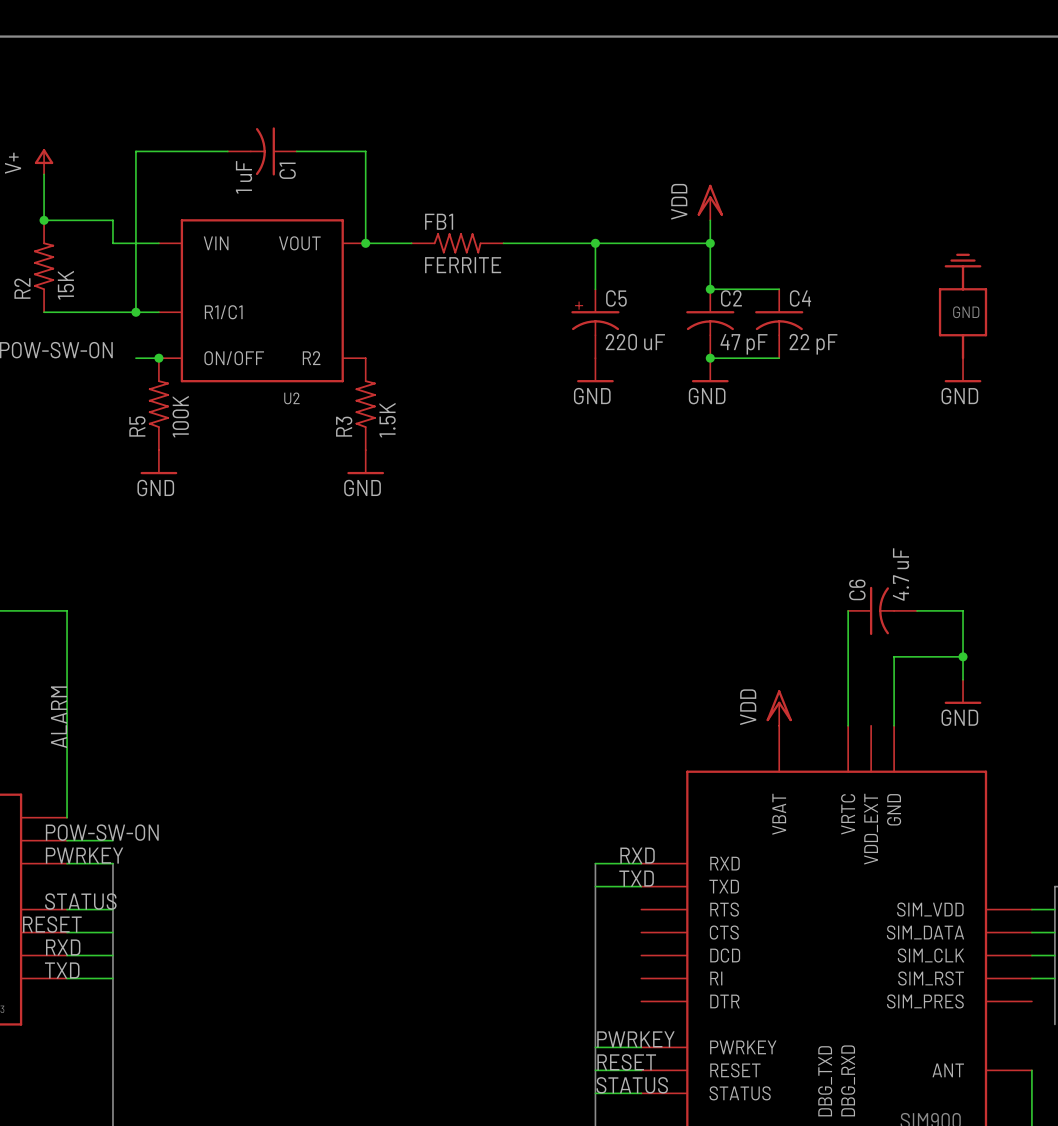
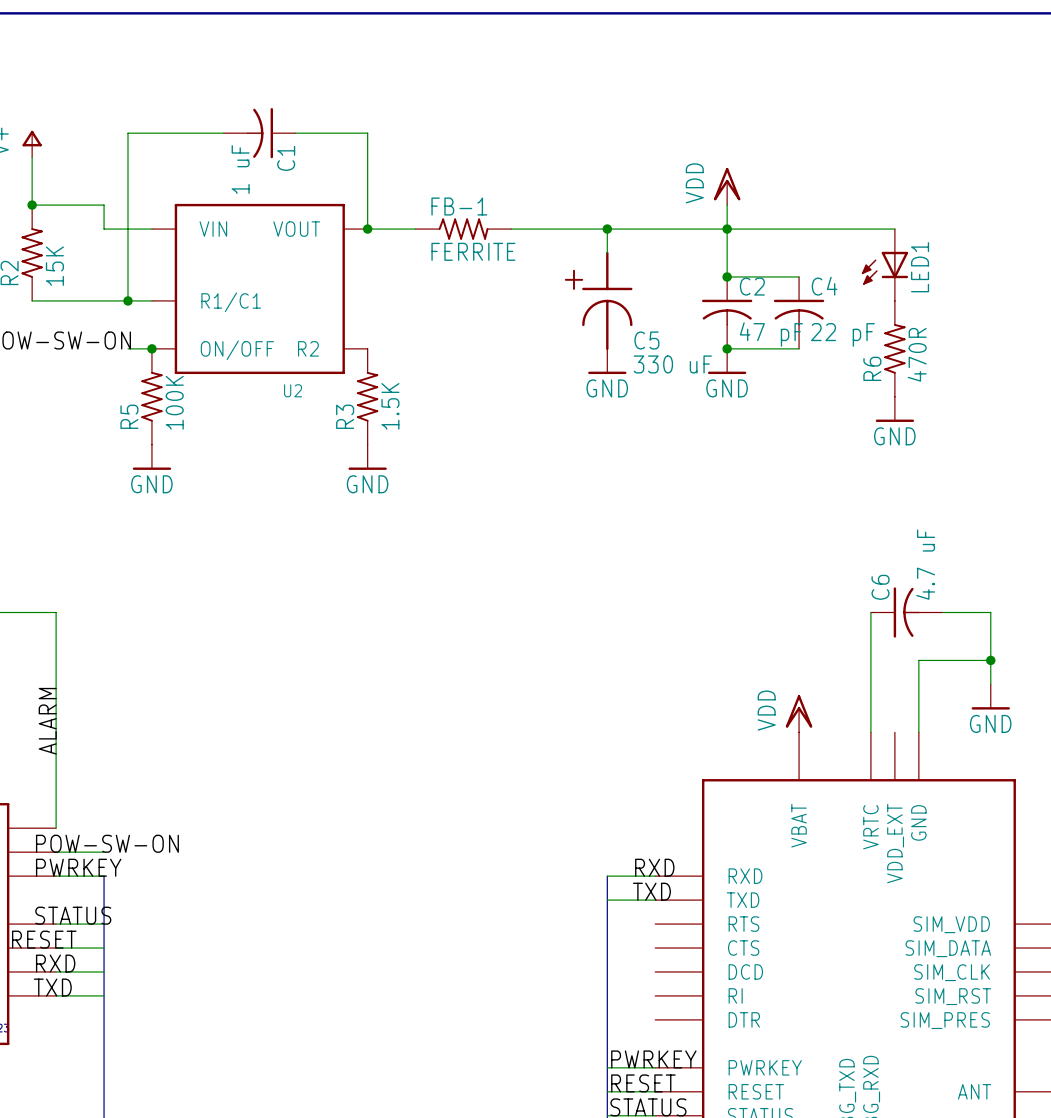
FB1 name: FB1 (439, 221) -> FB-1 (459, 206)
wire: none -> (727, 229) (894, 229)
LED1: none -> (884, 264)
C5 symbol: [571, 289, 620, 359] -> [582, 251, 633, 351]
C5 name position: C5 (616, 298) -> C5 (646, 340)
part: (963, 306) -> none
C5 value: 220 uF (635, 342) -> 330 uF (672, 364)
R6: none -> 470R (894, 348)
power symbol position: GND (963, 370) -> GND (894, 409)

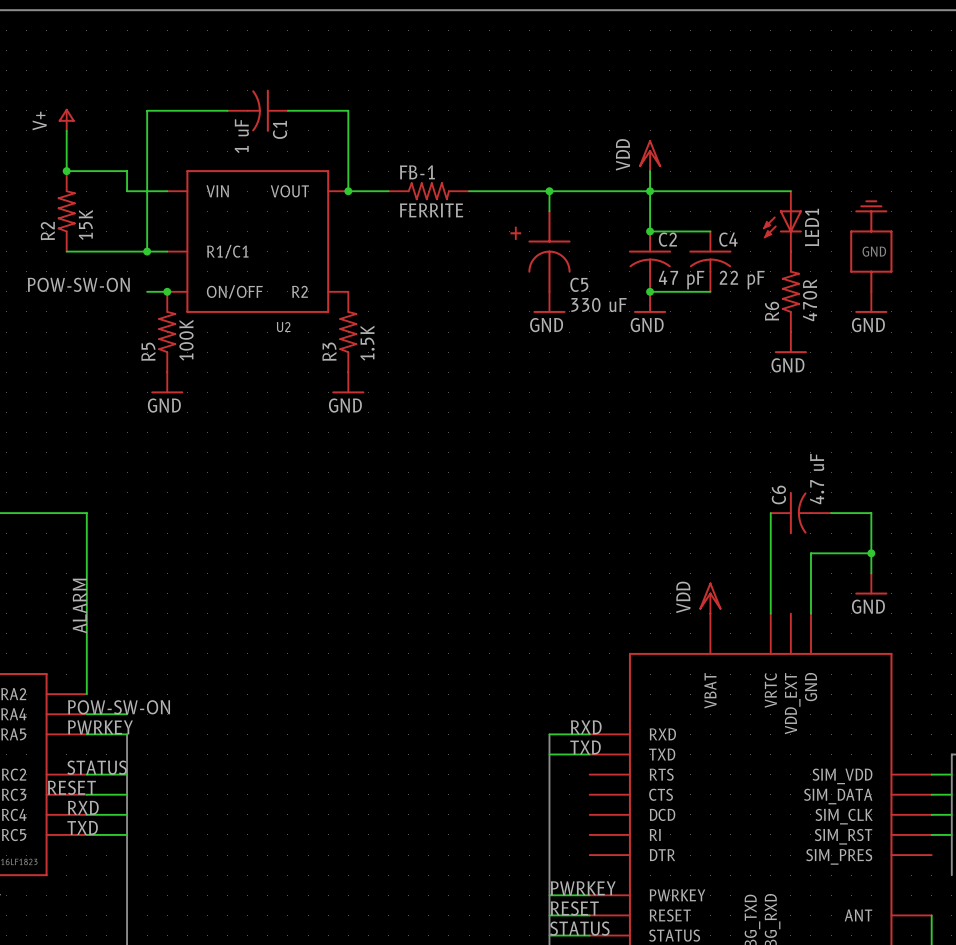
part: none -> (871, 246)
power symbol: none -> GND (871, 302)

